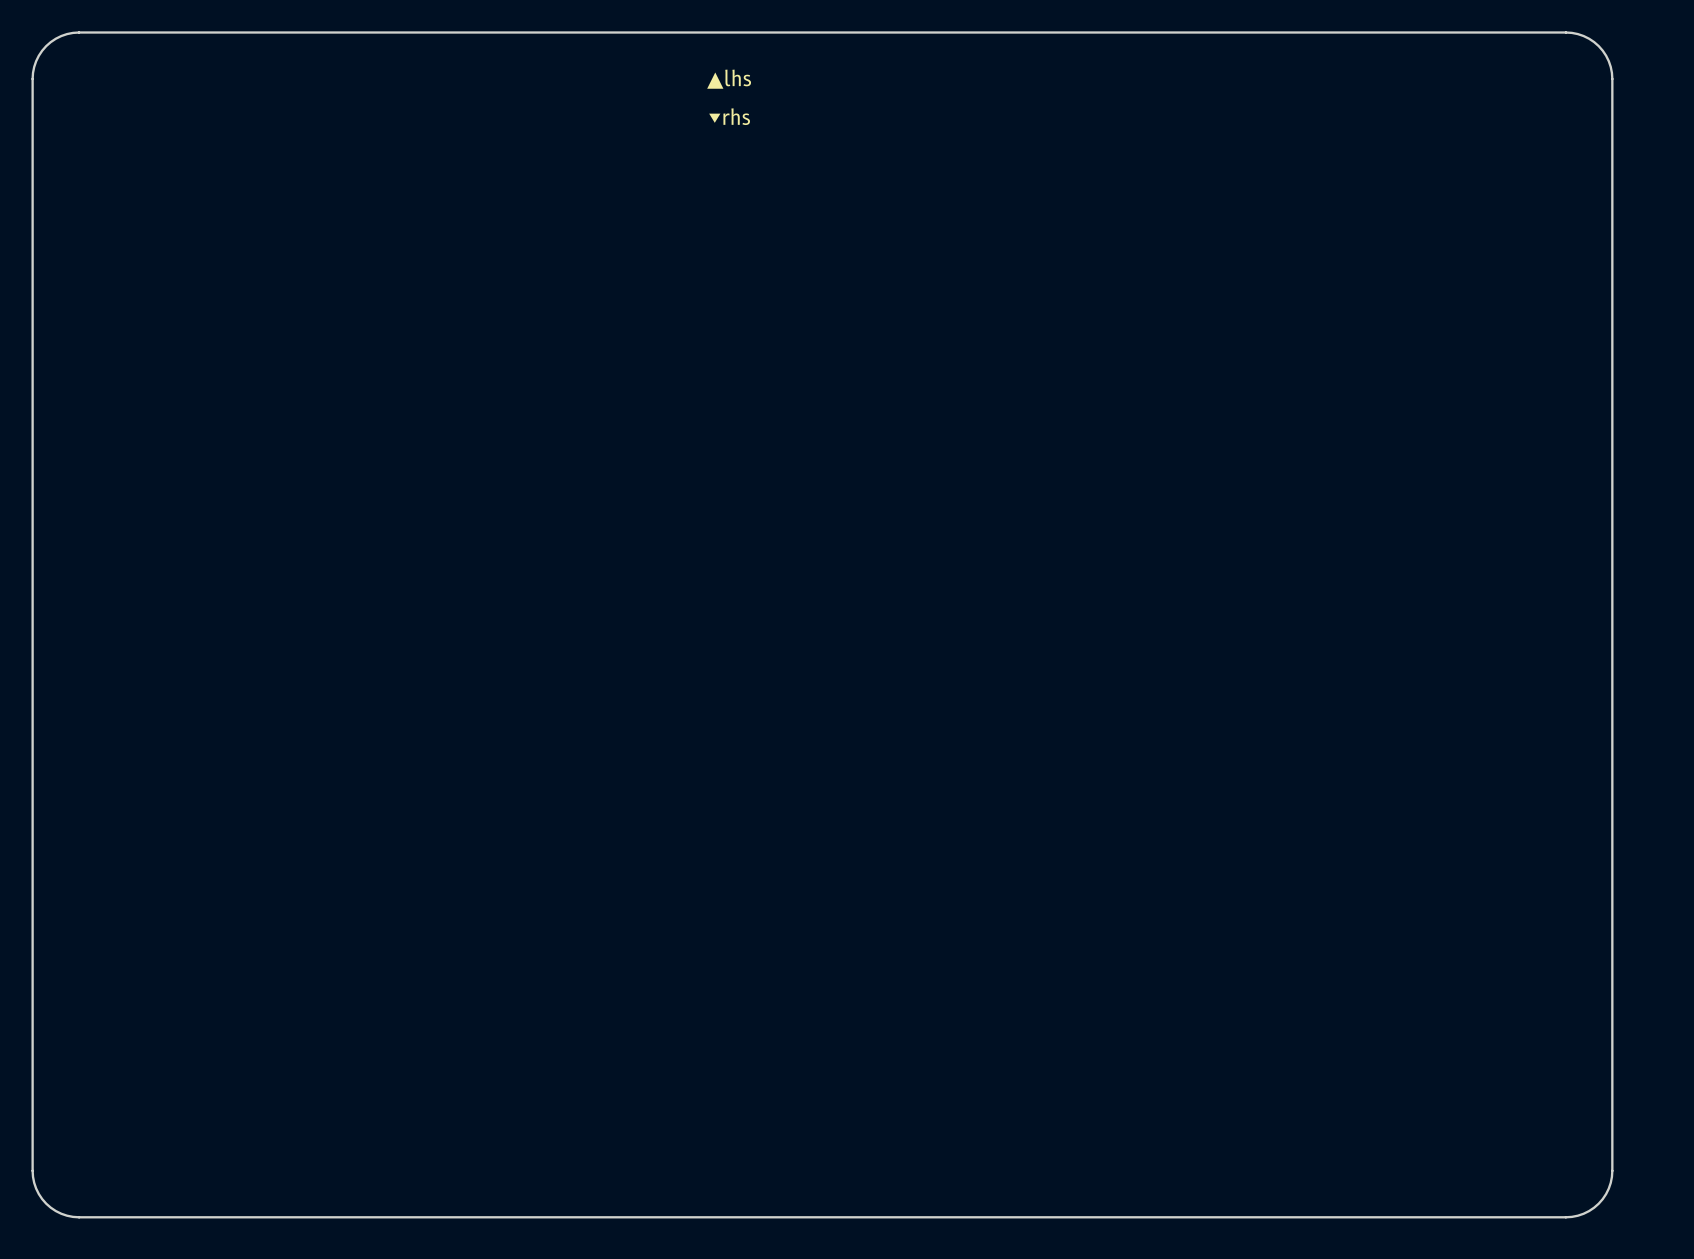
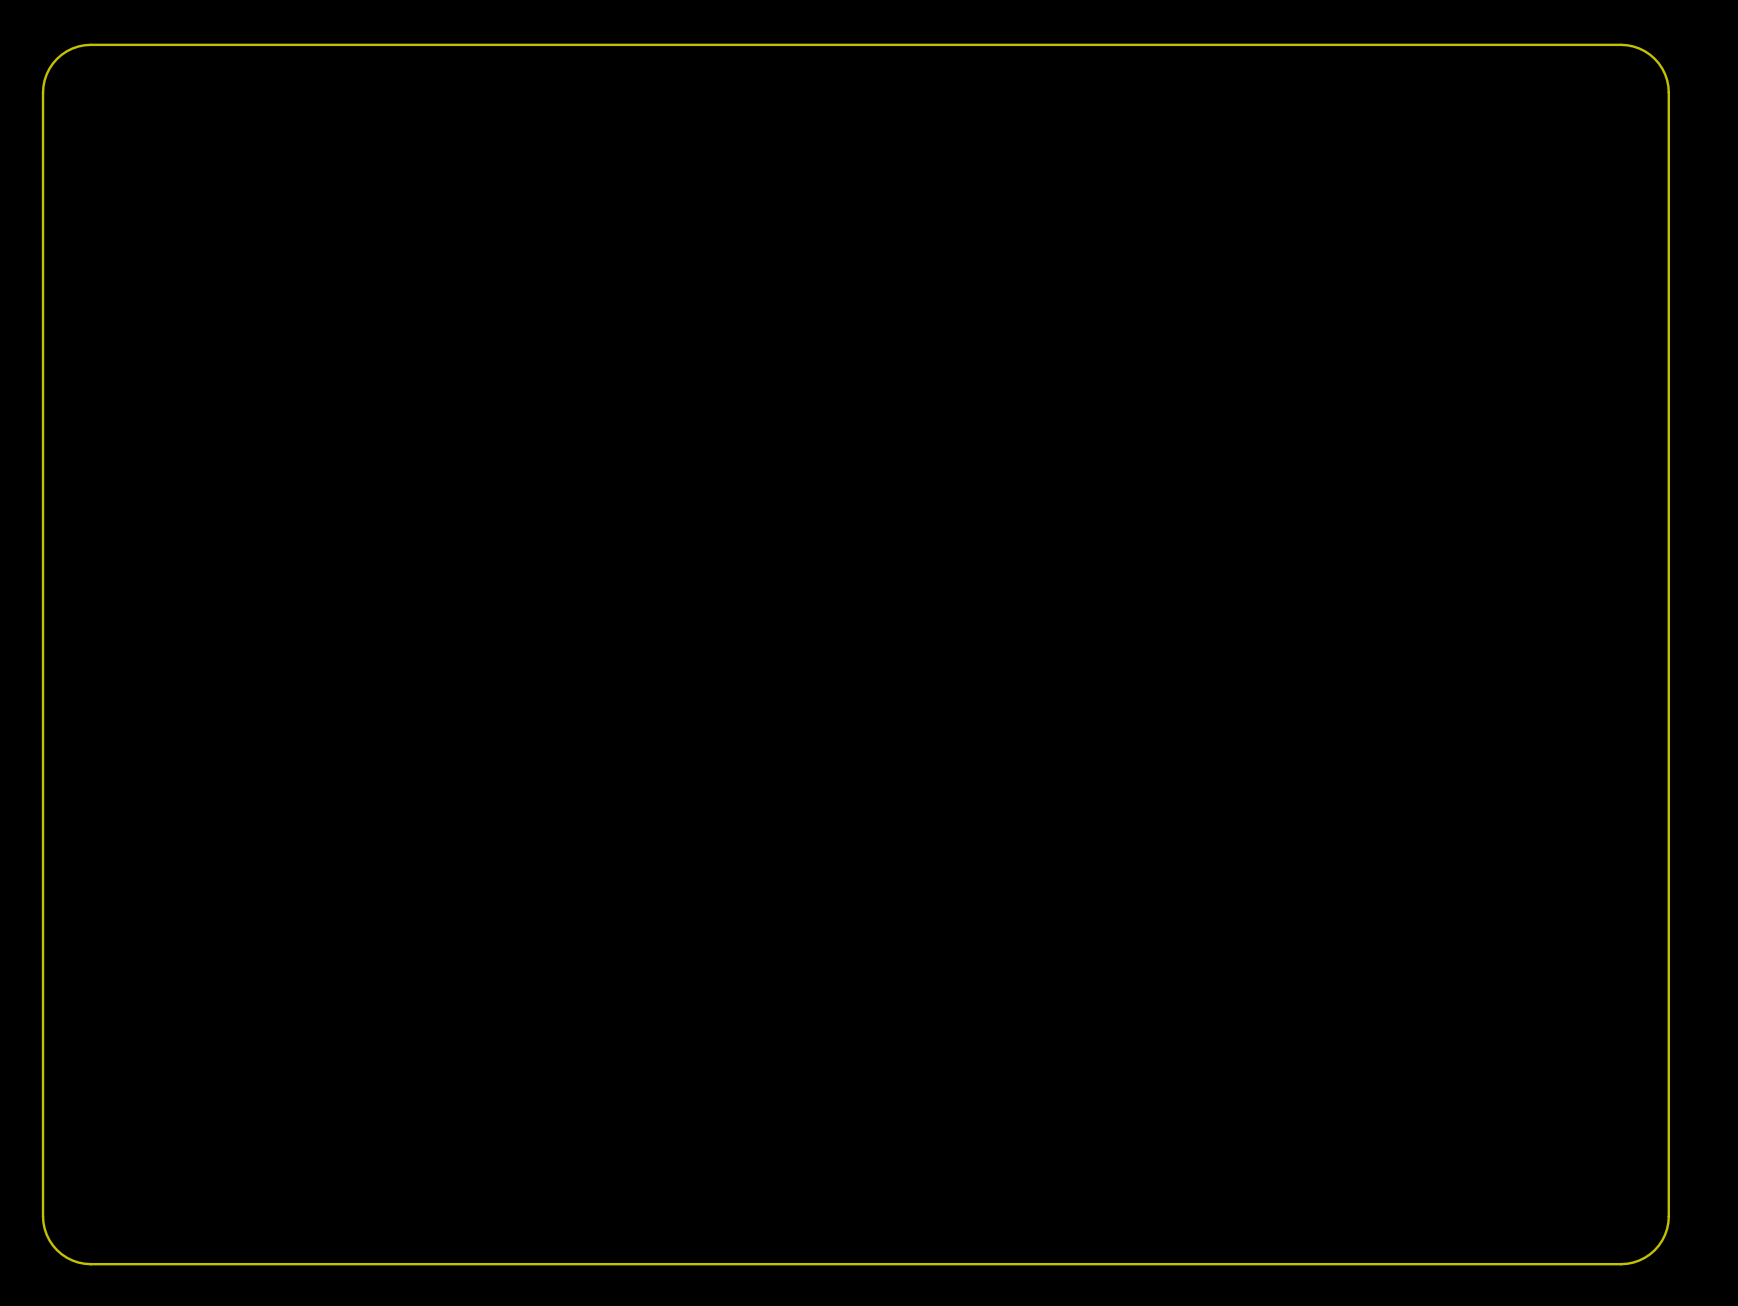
text: ▲lhs (729, 79) -> none
text: ▼rhs (729, 116) -> none

